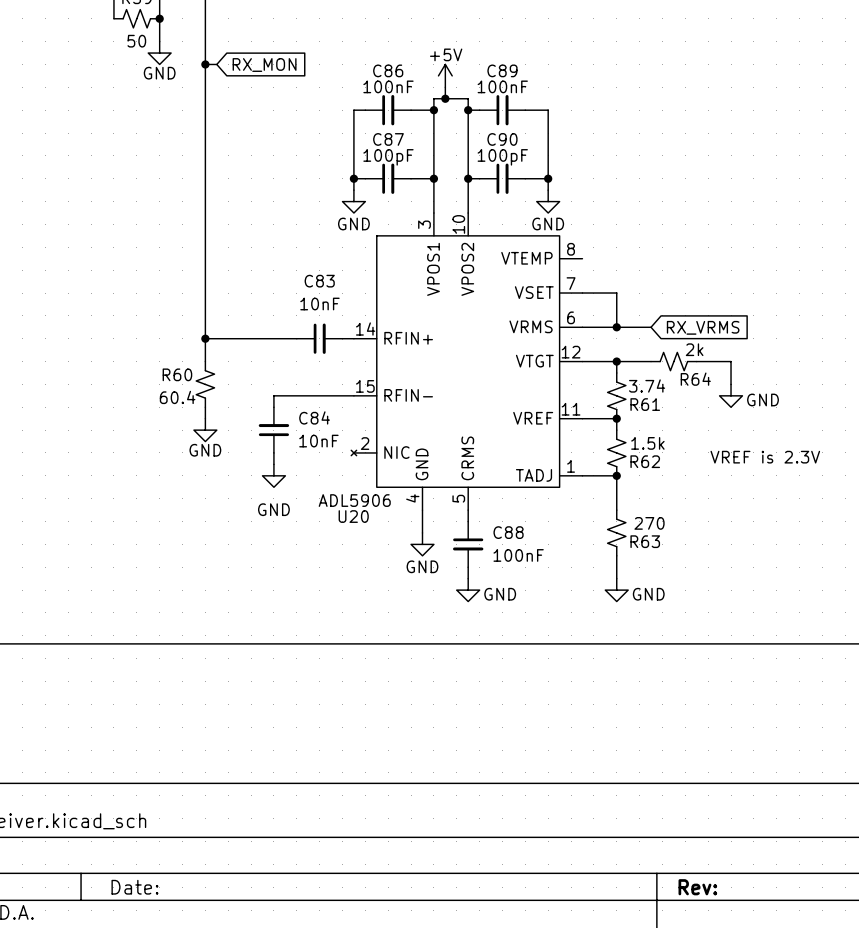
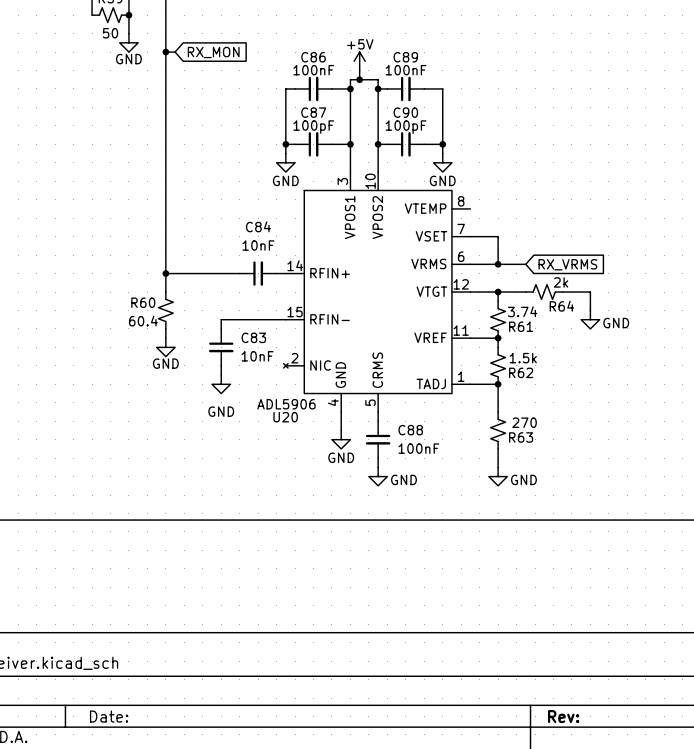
C83 name: C83 (319, 281) -> C84 (258, 226)
C84: 10nF (273, 430) -> none
C83: none -> 10nF (221, 347)
text: VREF is 2.3V (765, 457) -> none

